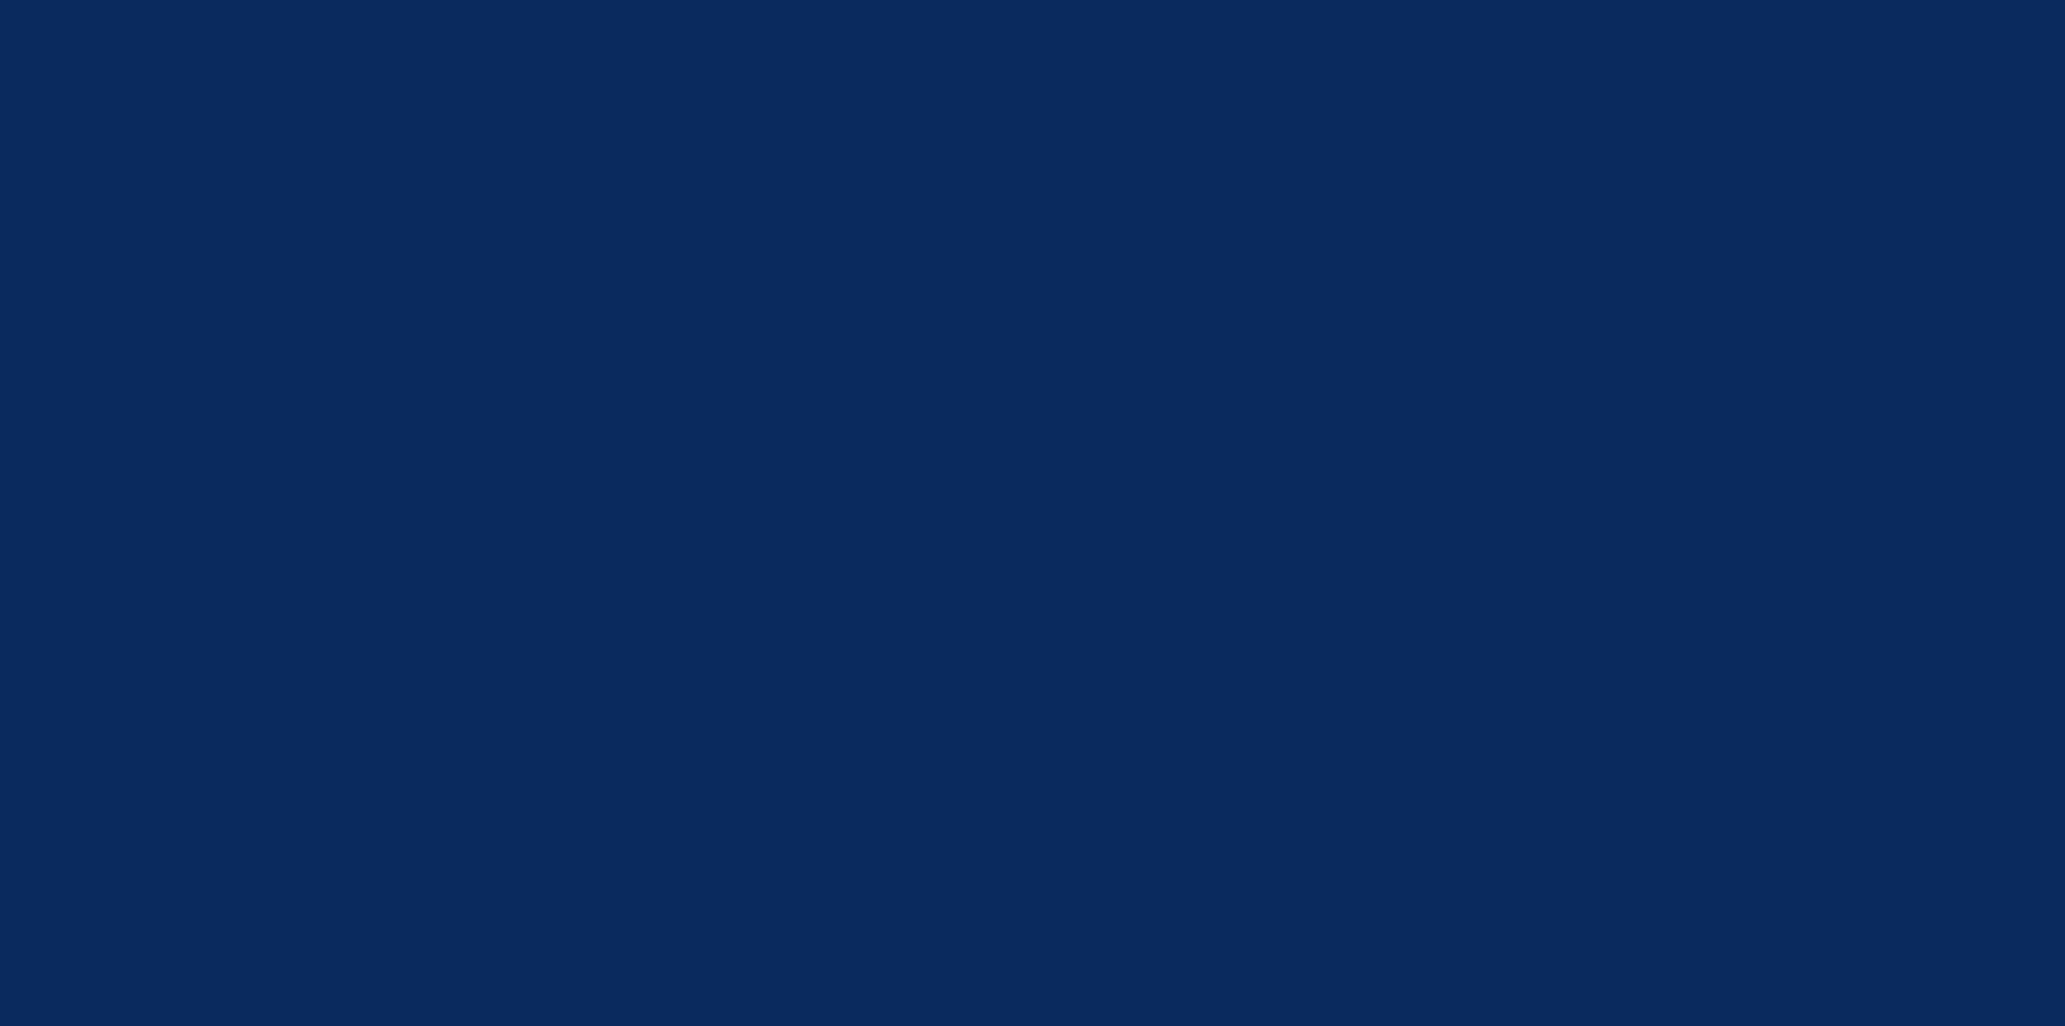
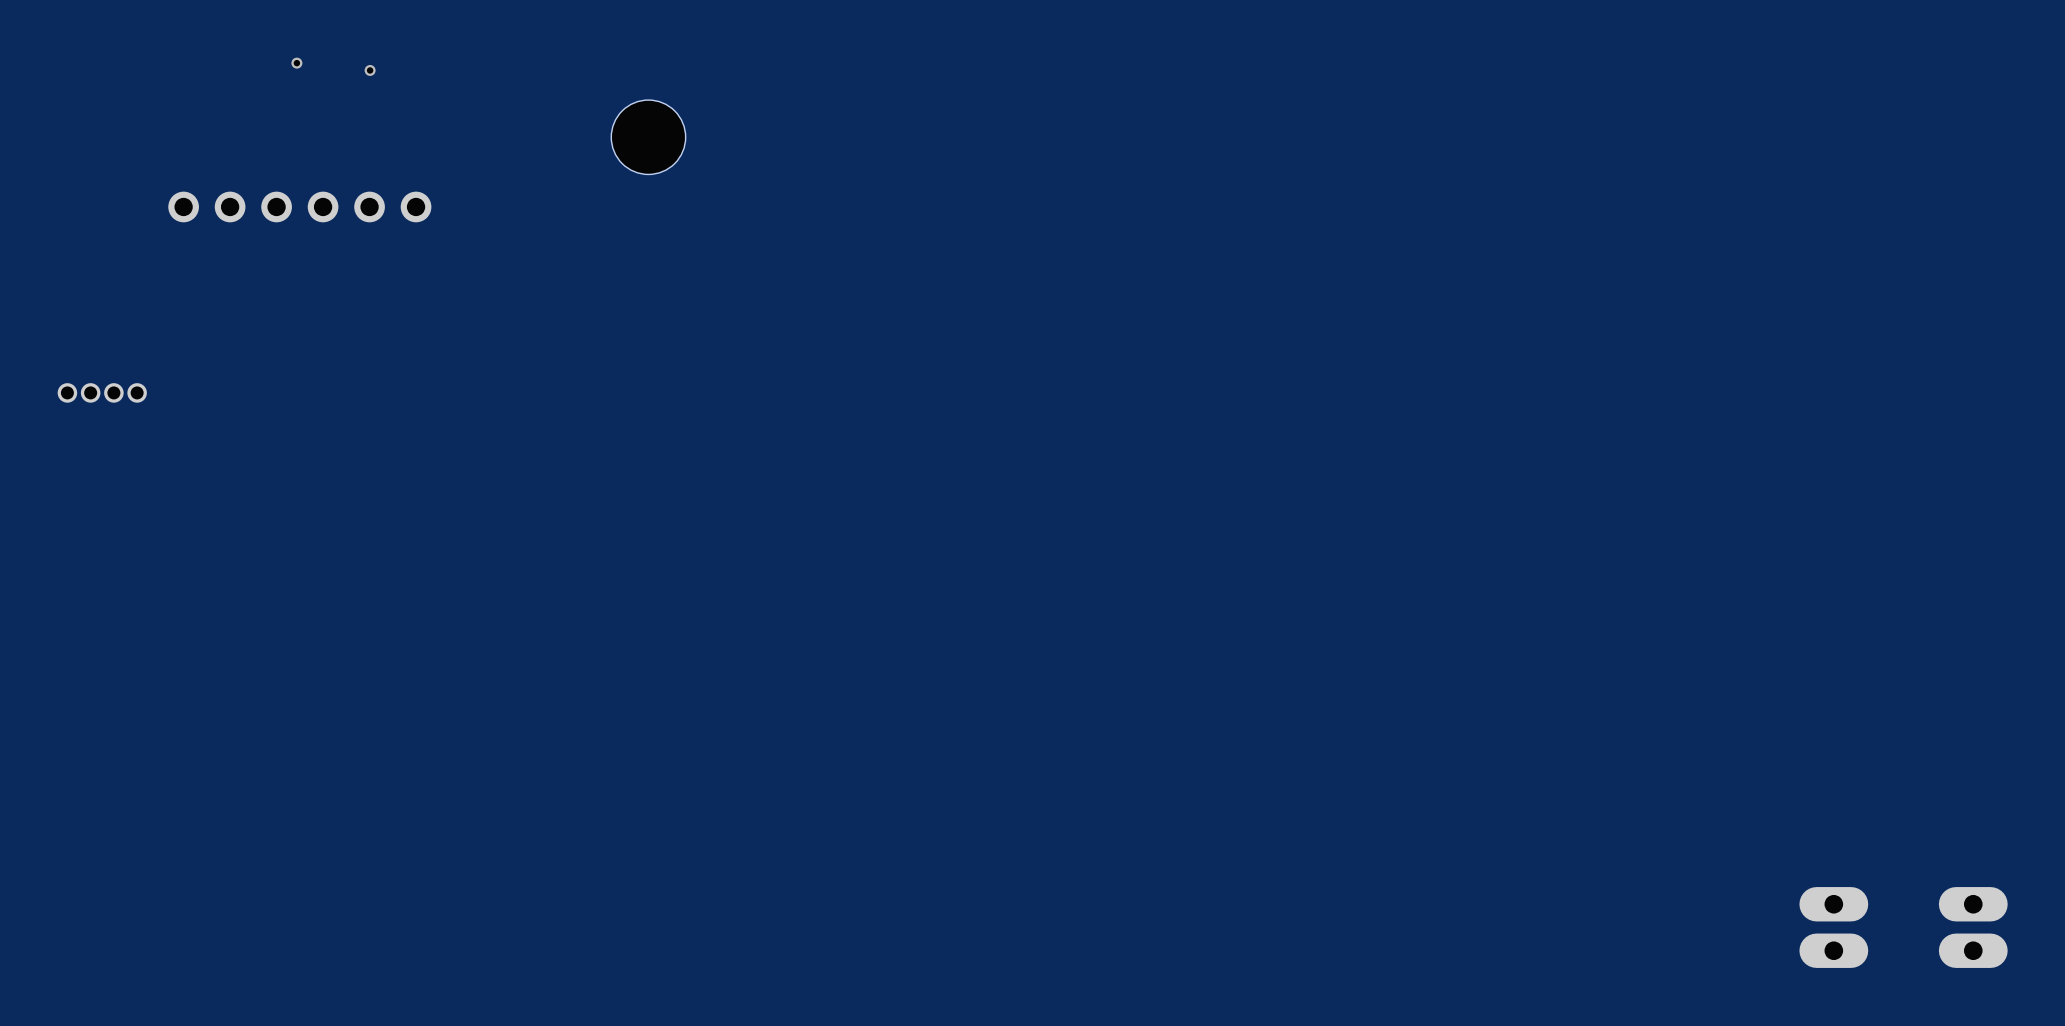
via: none -> (296, 63)
via: none -> (370, 70)
hole: none -> (648, 137)
part: none -> (299, 206)
part: none -> (102, 392)
part: none -> (1833, 927)
part: none -> (1973, 927)

